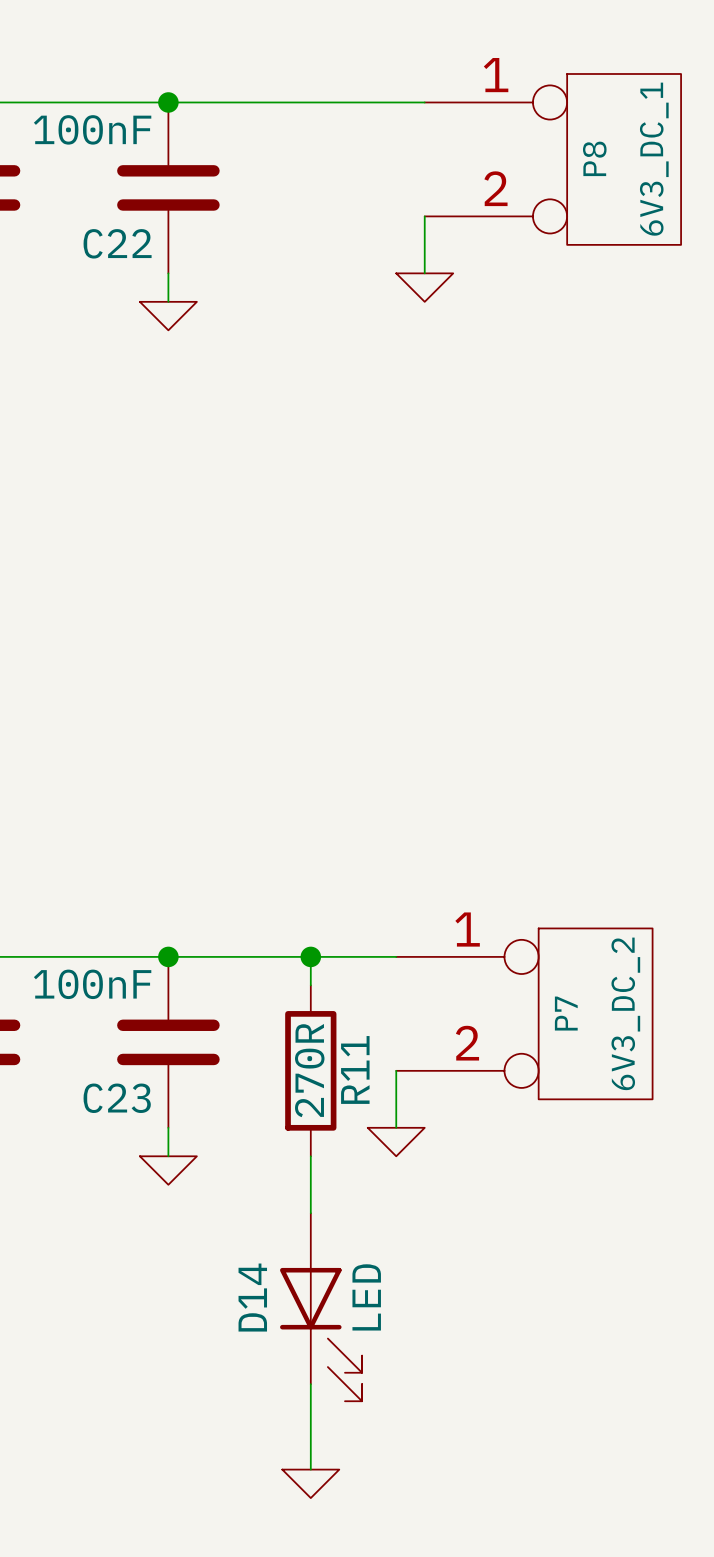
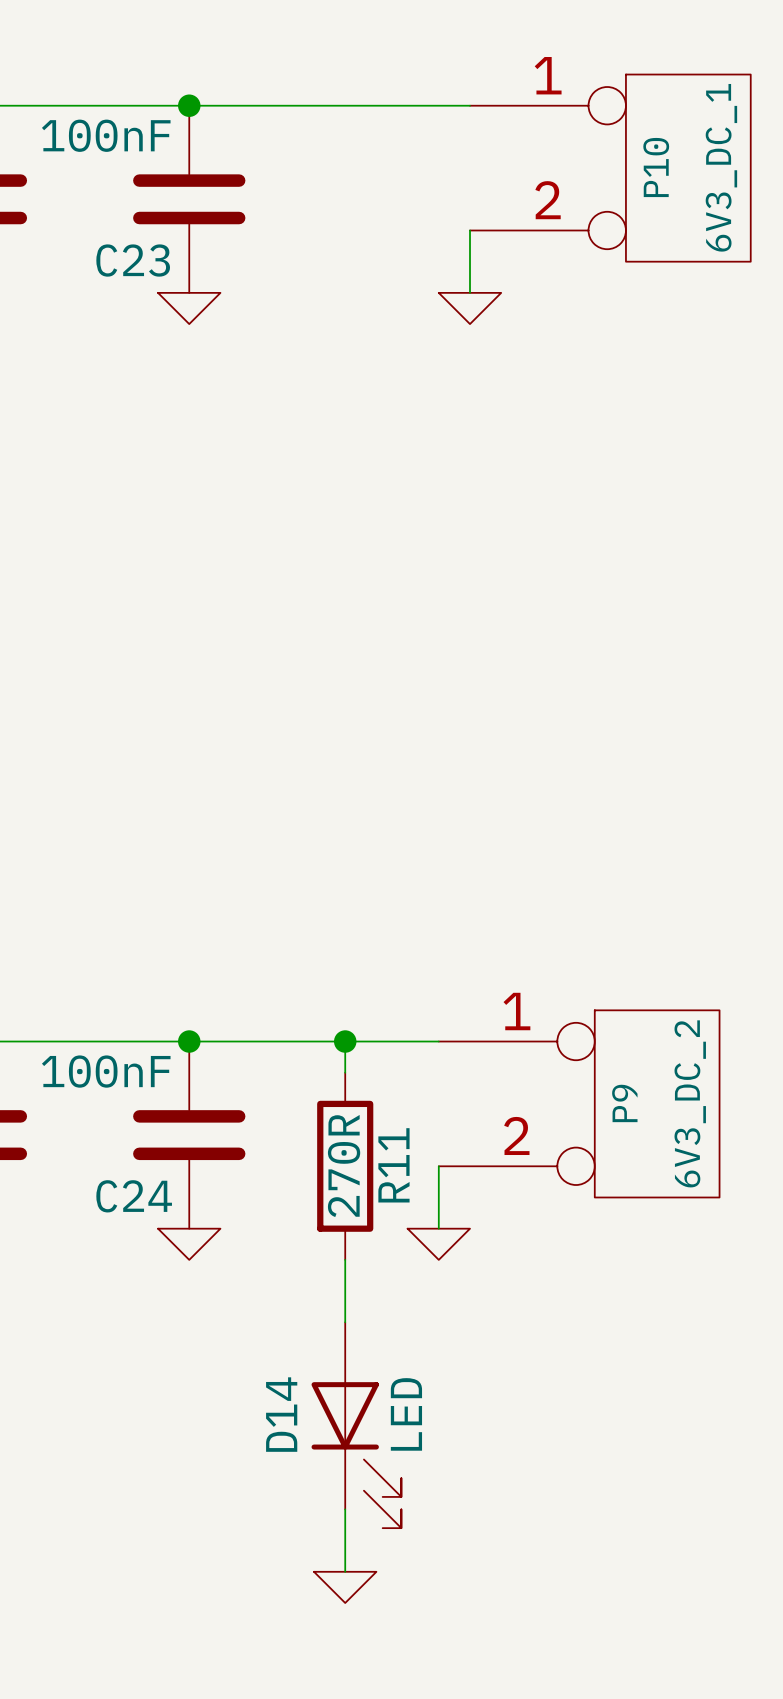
P8 name: P8 (594, 158) -> P10 (656, 167)
C22 name: C22 (117, 243) -> C23 (133, 260)
wire: (168, 273) (168, 301) -> none
power symbol position: (168, 316) -> (189, 308)
P7 name: P7 (566, 1013) -> P9 (624, 1103)
C23 name: C23 (117, 1098) -> C24 (134, 1196)
wire: (168, 1127) (168, 1156) -> none
power symbol position: (168, 1170) -> (189, 1244)
wire: (310, 1441) (310, 1469) -> none
power symbol position: (310, 1483) -> (345, 1587)

